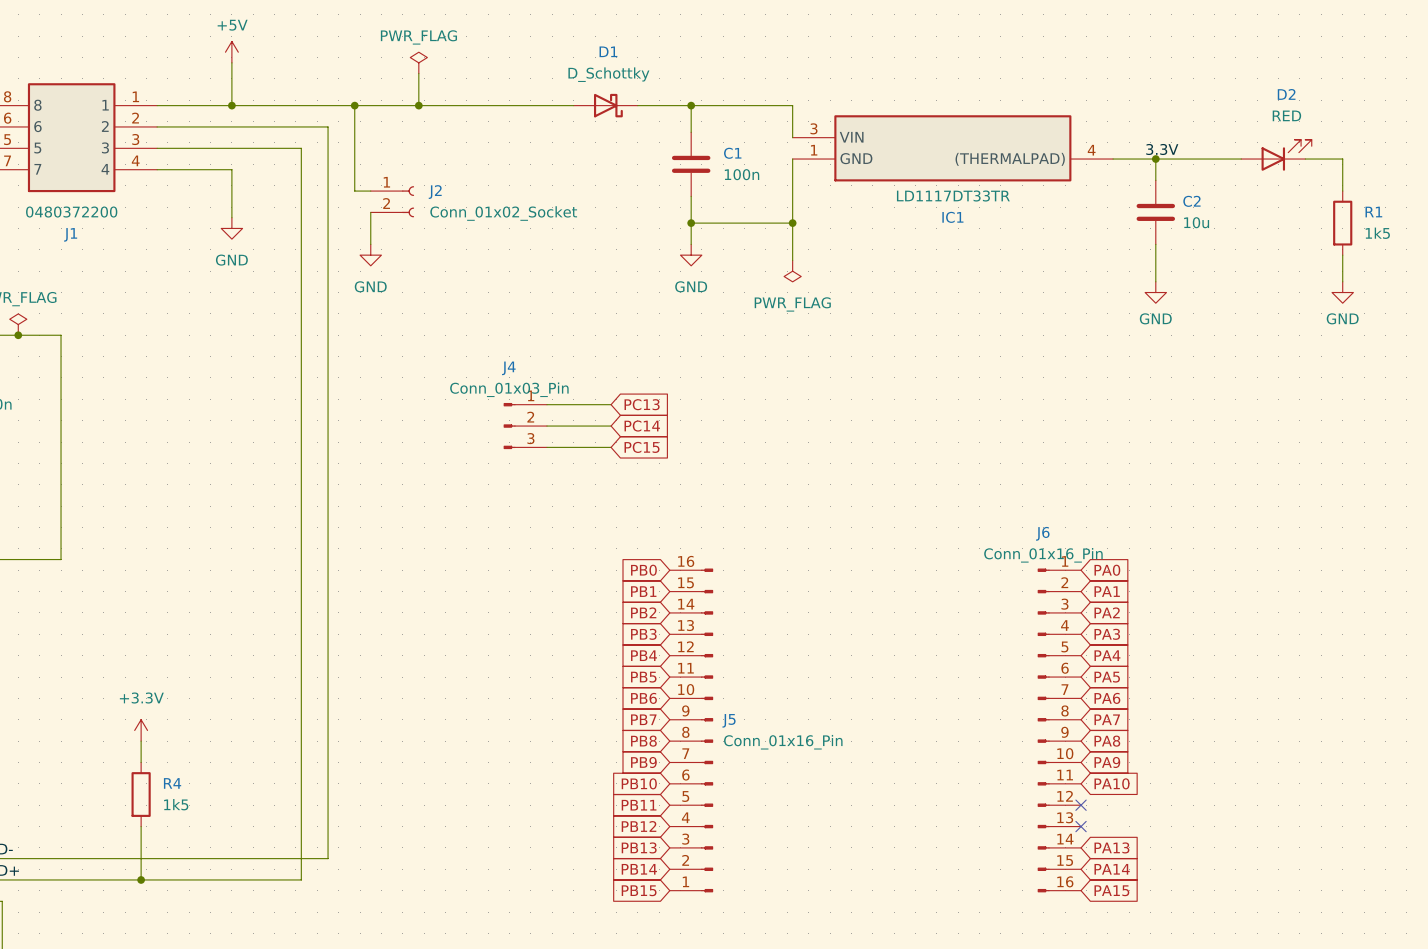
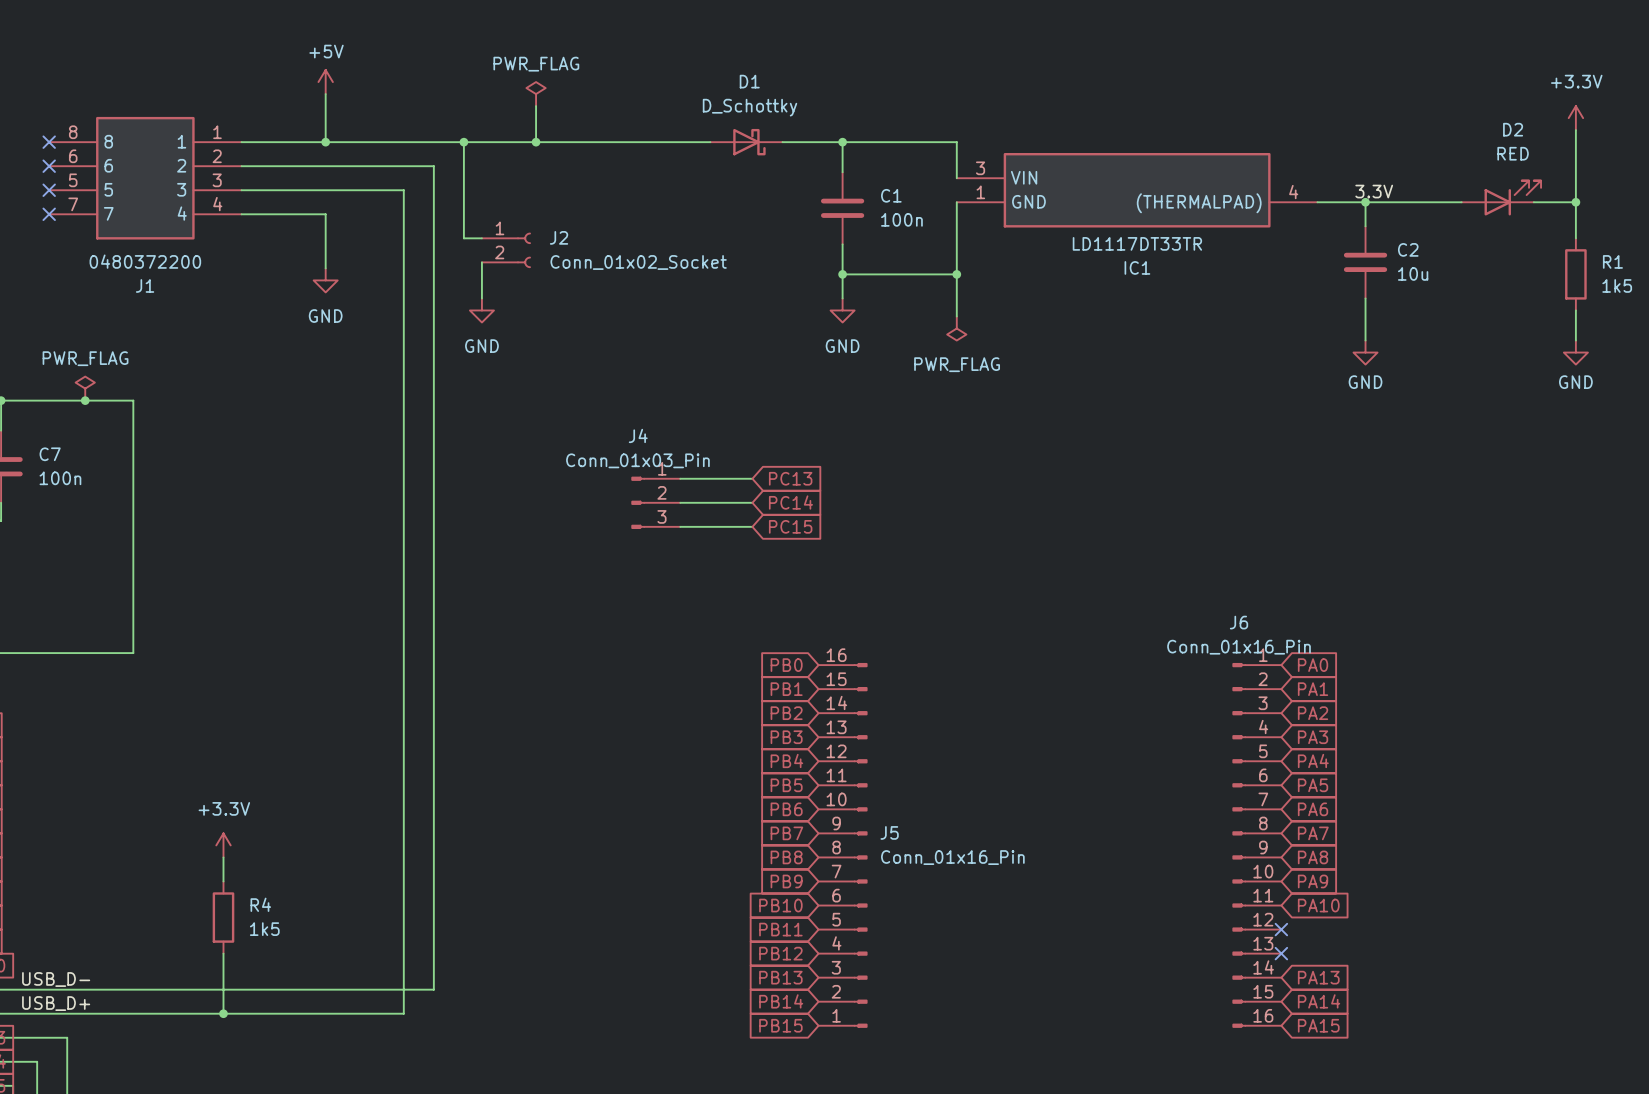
power symbol: none -> +3.3V (1575, 118)
wire: none -> (1575, 130) (1575, 202)
junction: none -> (1575, 202)

